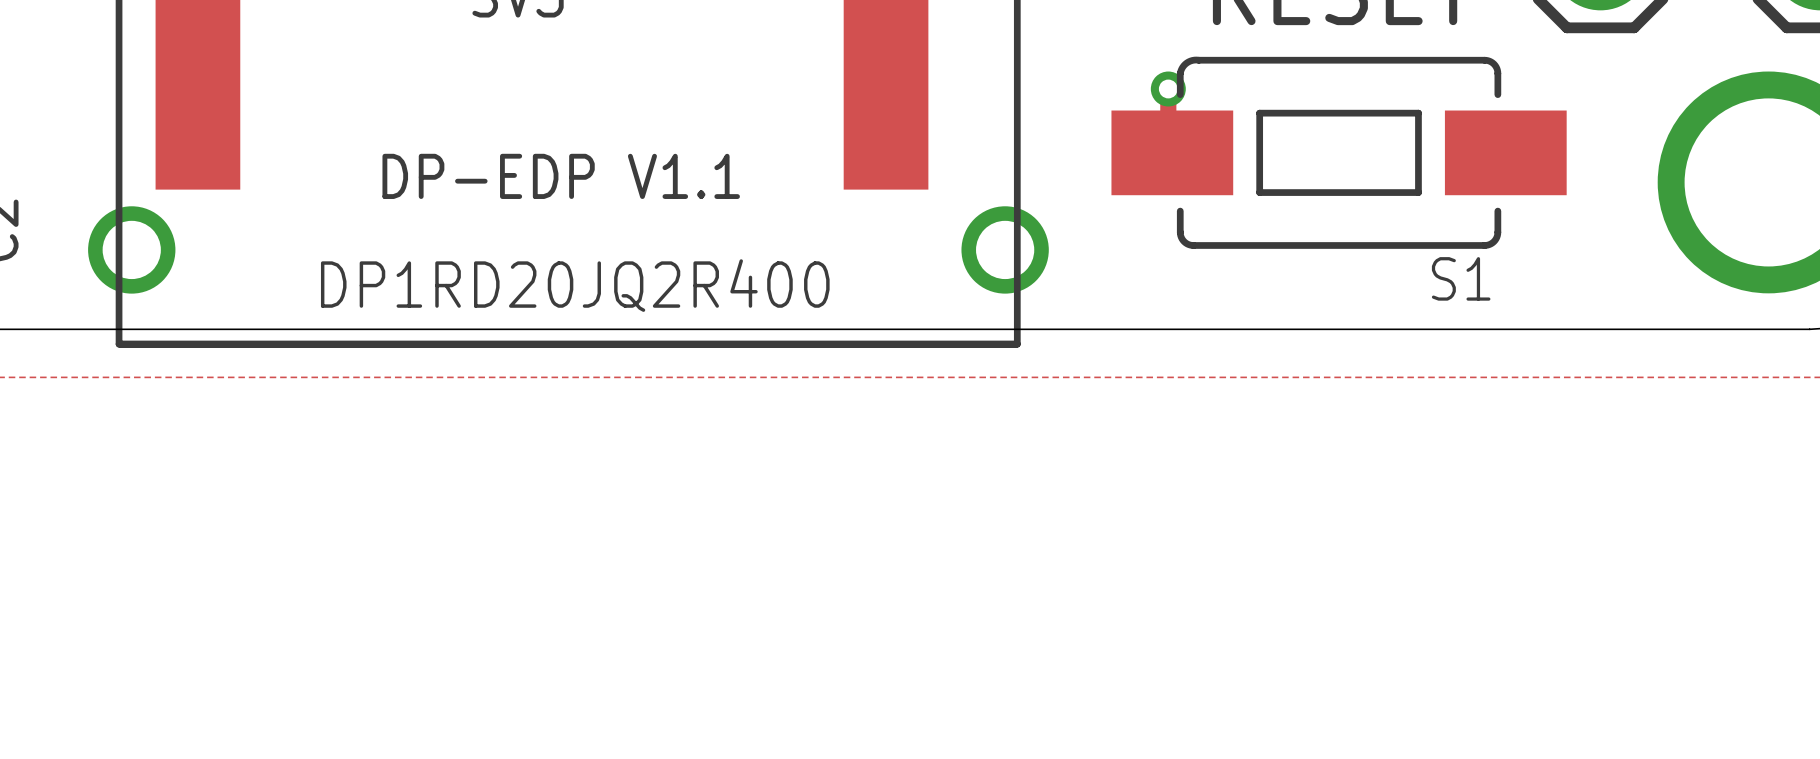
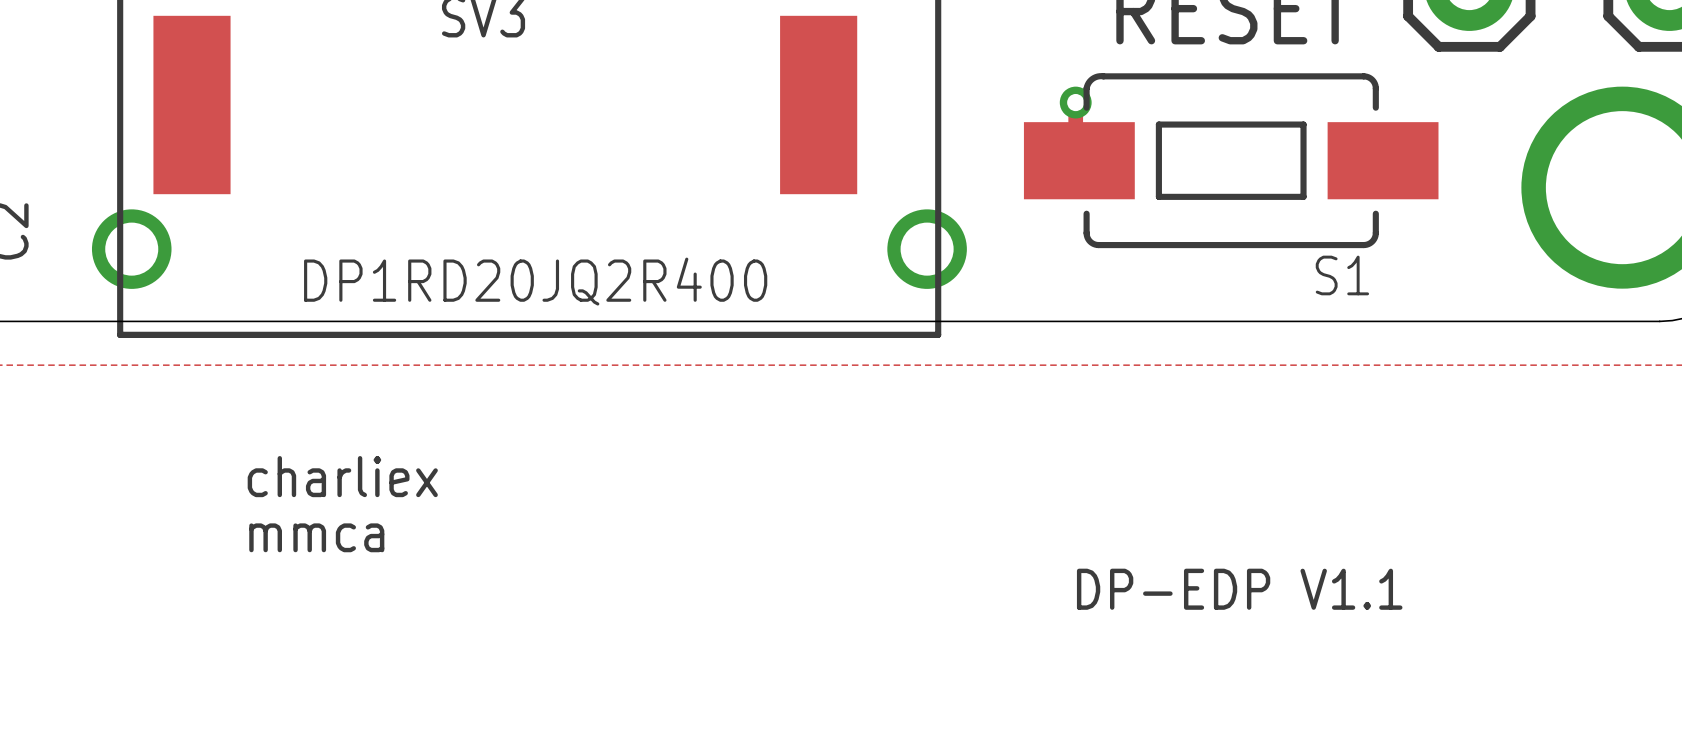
text position: DP-EDP V1.1 (561, 176) -> DP-EDP V1.1 (1239, 589)
text: none -> charliex (342, 476)
text: none -> mmca (316, 537)

